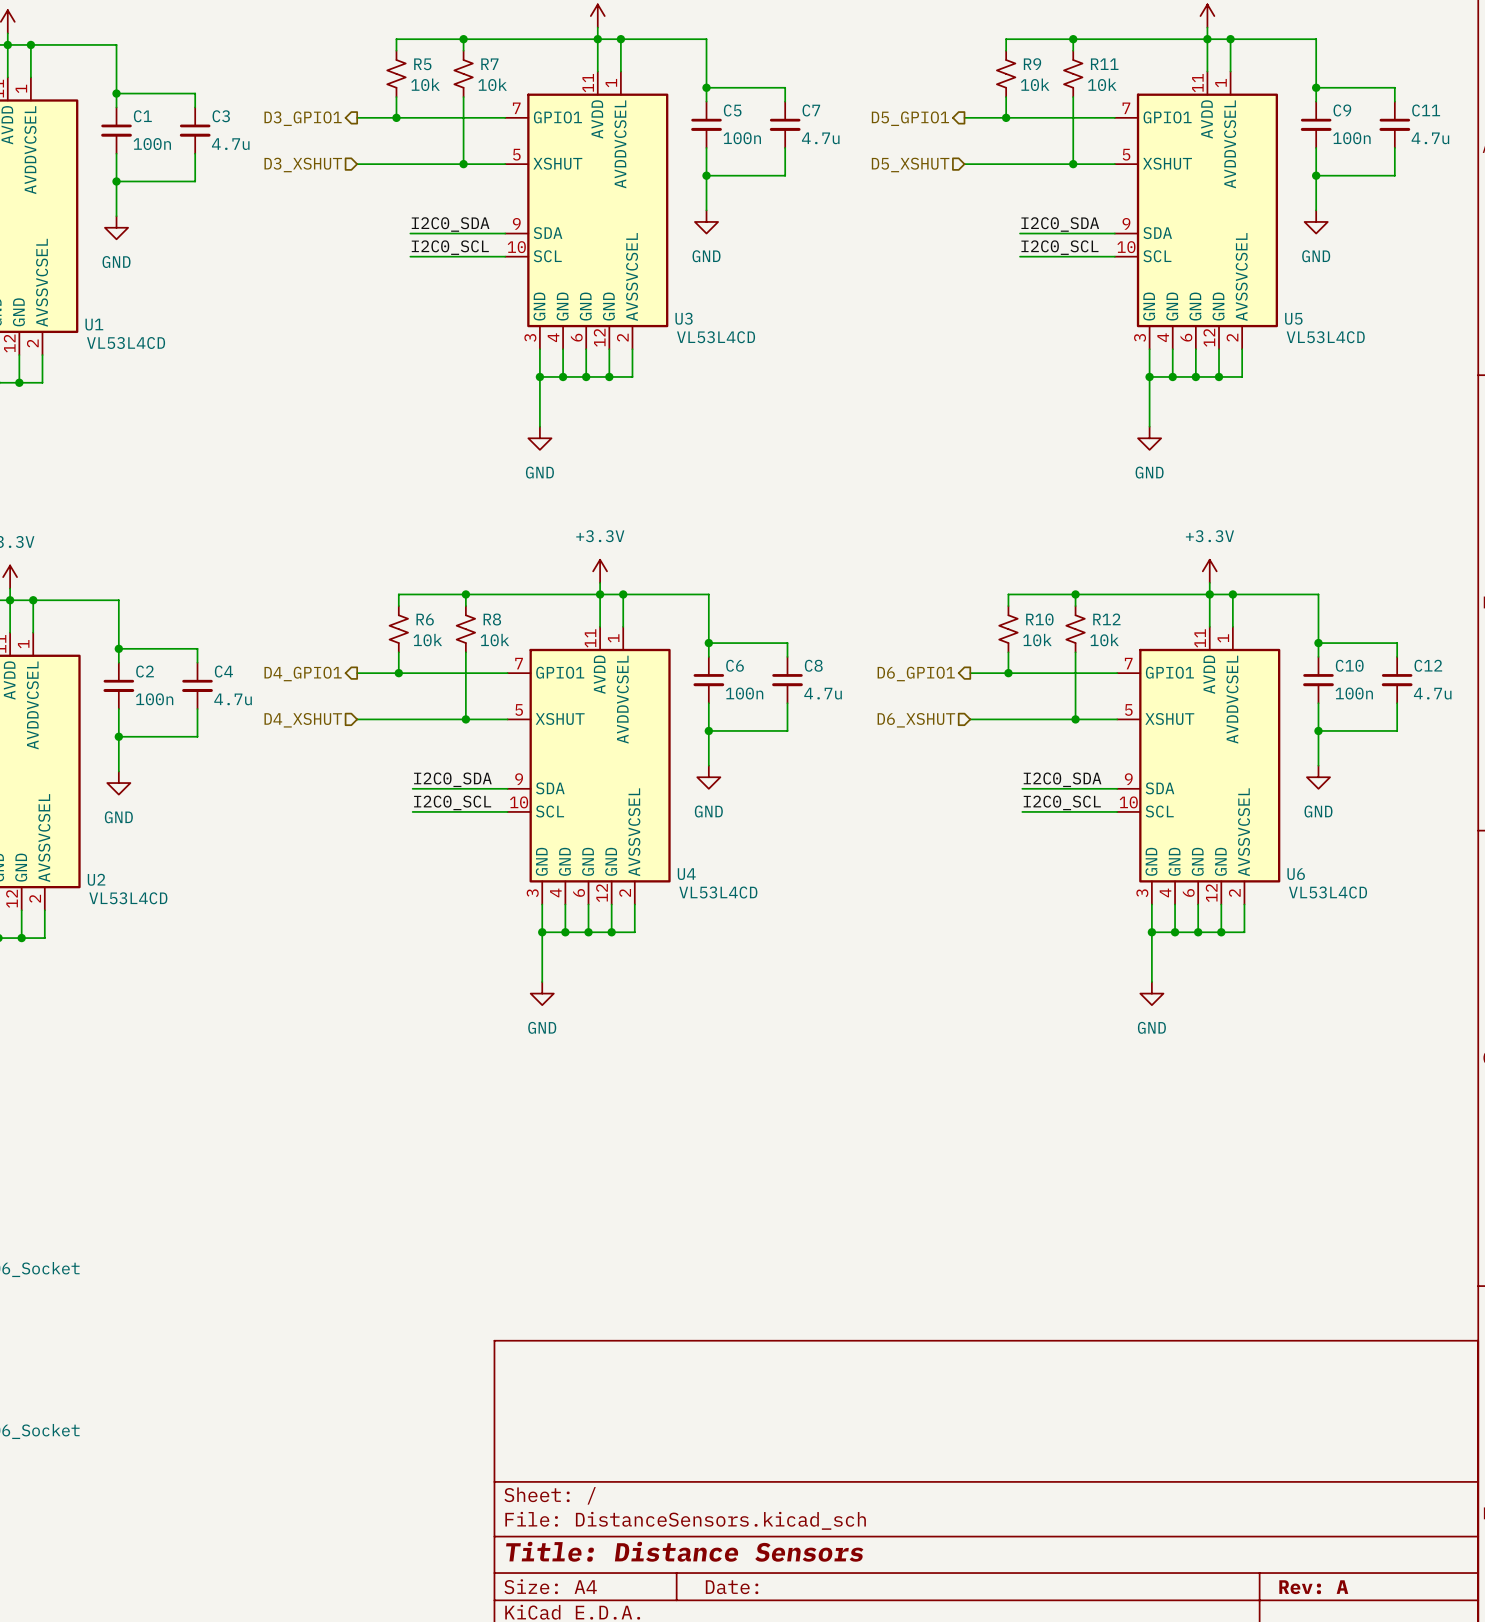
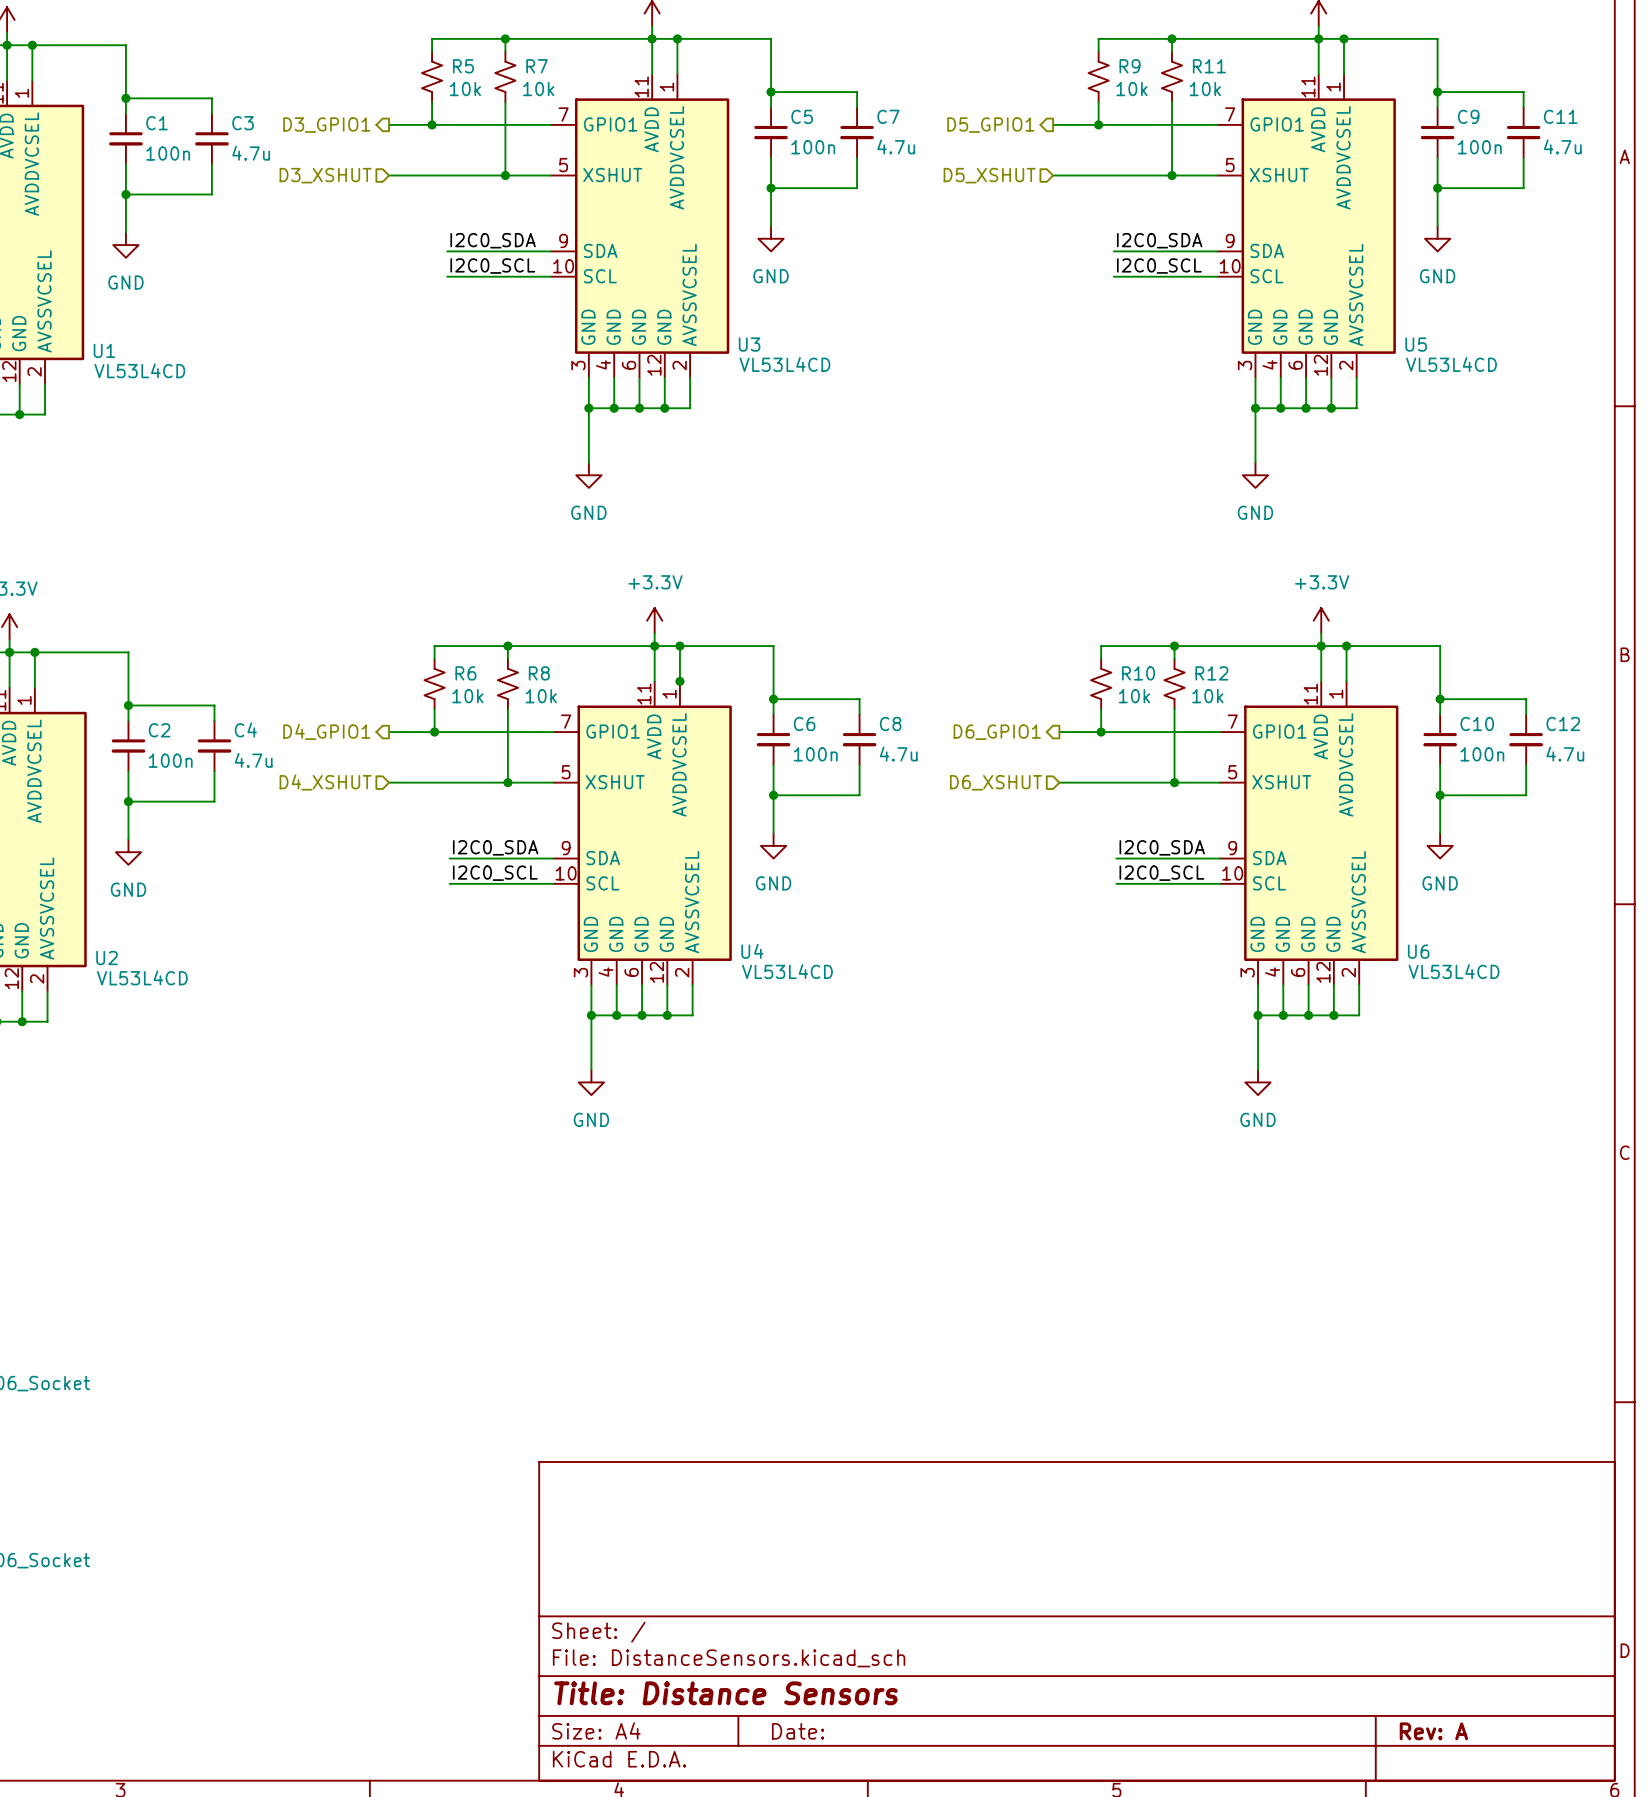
junction: none -> (679, 681)

